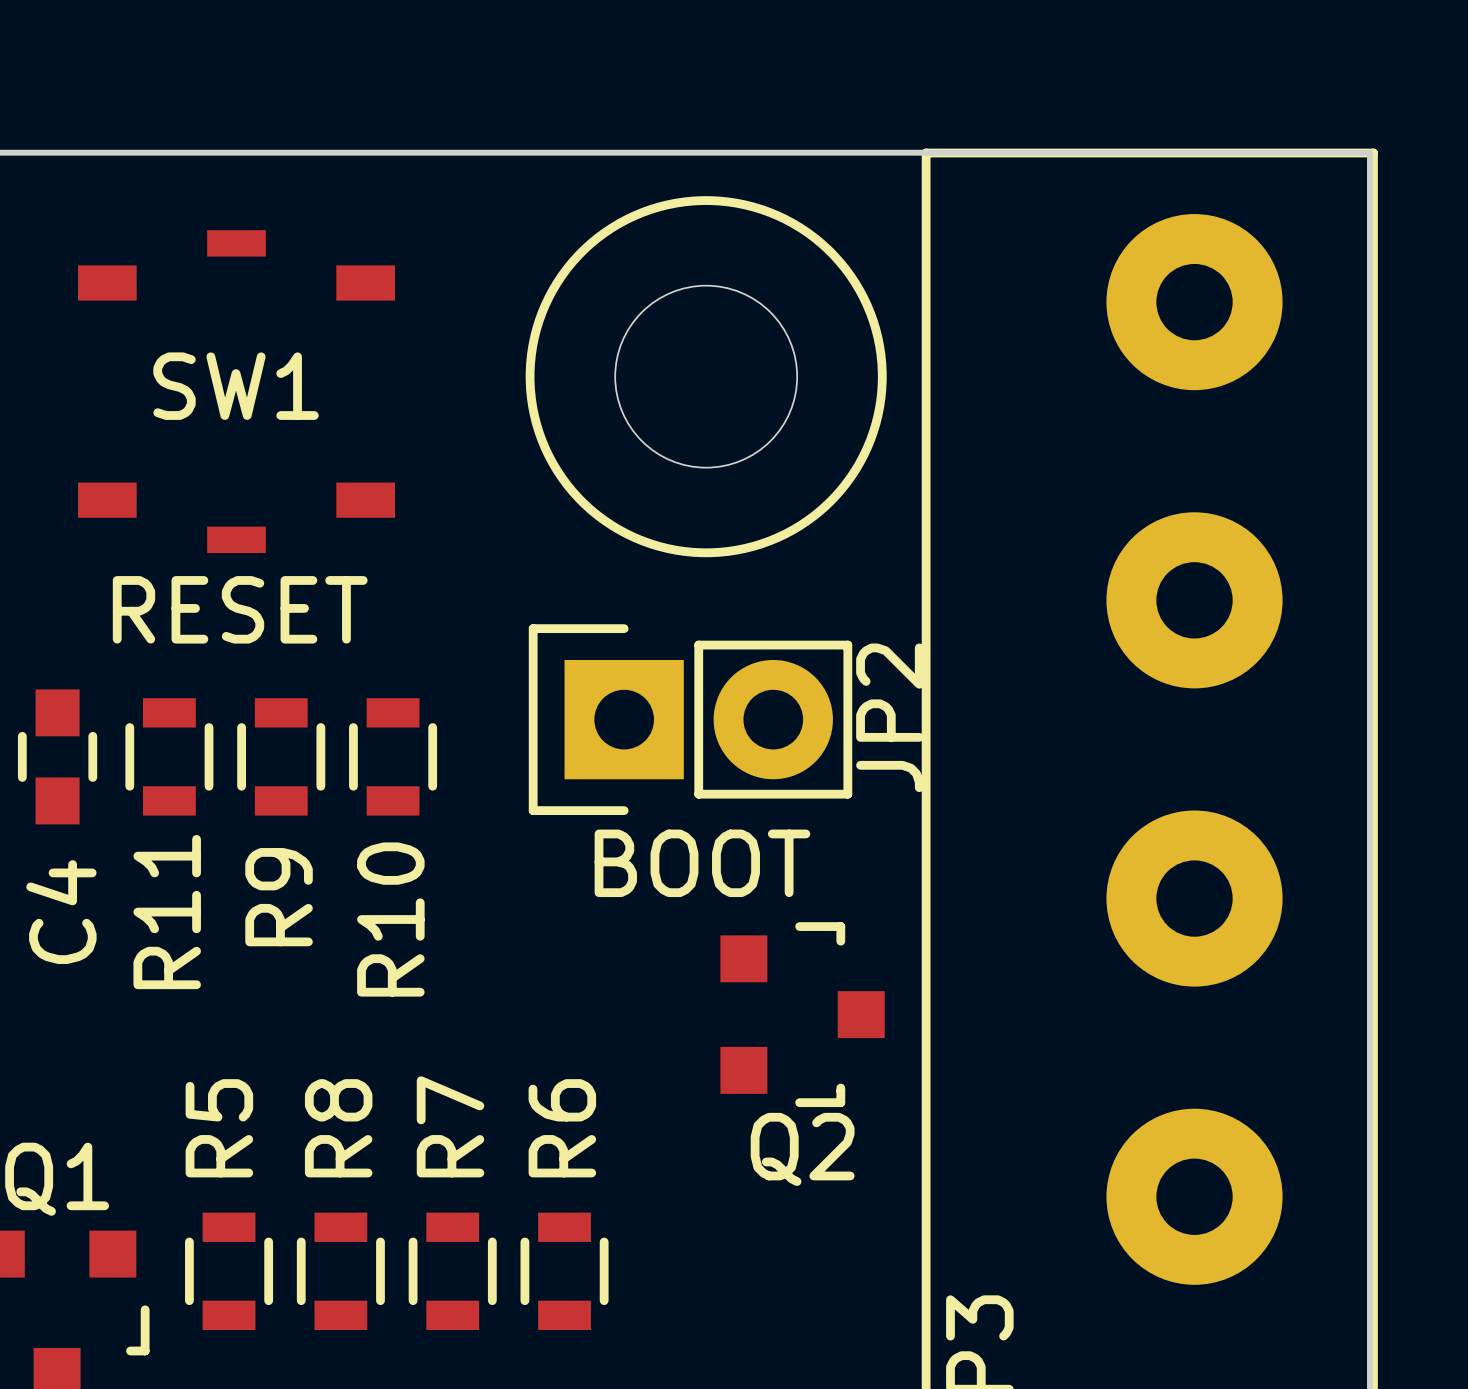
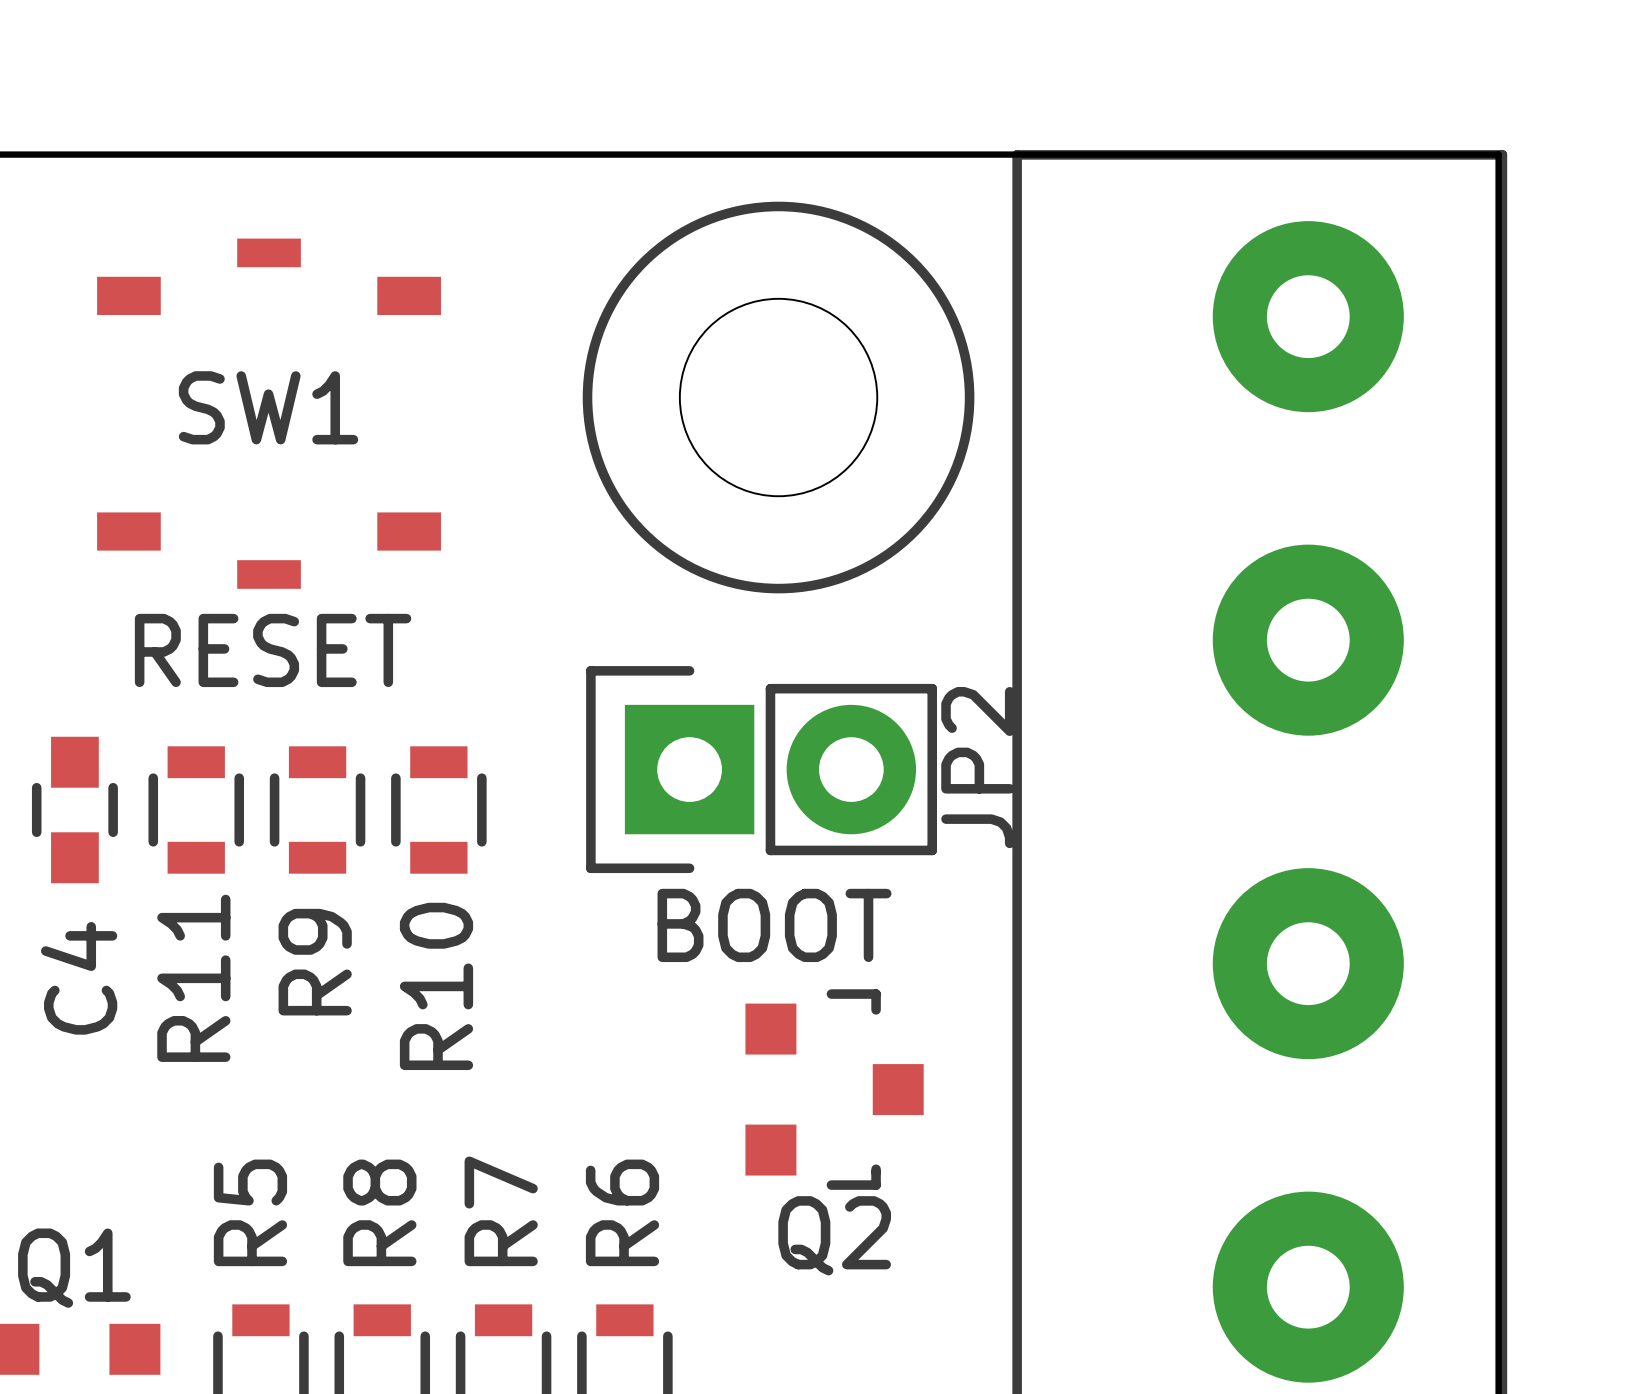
Q2 position: (802, 1014) -> (834, 1089)

